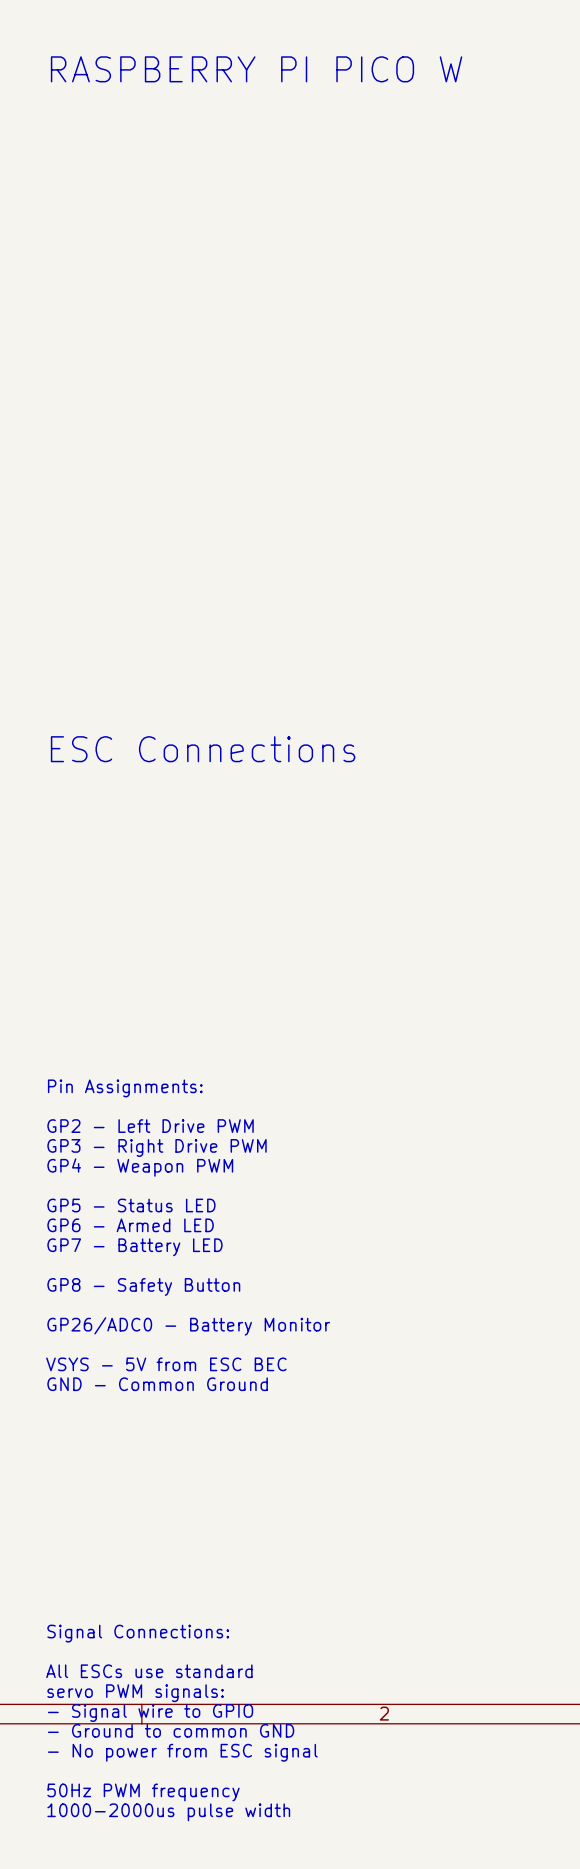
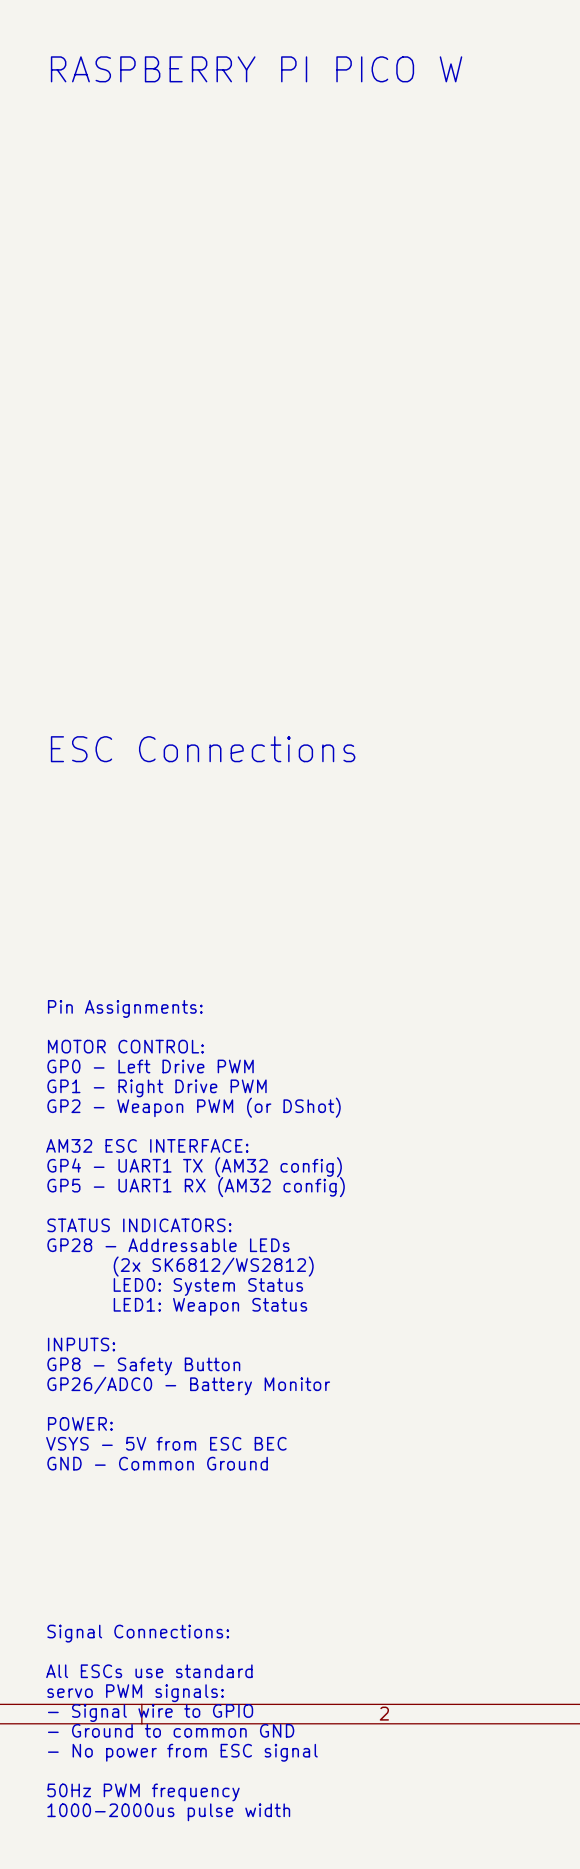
text: none -> Pin Assignments: (125, 1008)
text: none -> MOTOR CONTROL: (125, 1046)
text: none -> GP0 - Left Drive PWM (150, 1066)
text: Pin Assignments: (125, 1088) -> GP1 - Right Drive PWM (157, 1088)
text: none -> GP2 - Weapon PWM (or DShot) (194, 1107)
text: GP2 - Left Drive PWM (150, 1126) -> none
text: GP3 - Right Drive PWM (157, 1147) -> AM32 ESC INTERFACE: (147, 1145)
text: GP4 - Weapon PWM (140, 1167) -> GP4 - UART1 TX (AM32 config) (194, 1167)
text: none -> GP5 - UART1 RX (AM32 config) (196, 1187)
text: GP5 - Status LED (131, 1205) -> none
text: GP6 - Armed LED (130, 1225) -> STATUS INDICATORS: (139, 1225)
text: GP7 - Battery LED (134, 1247) -> GP28 - Addressable LEDs (168, 1245)
text: none -> (2x SK6812/WS2812) (213, 1266)
text: GP8 - Safety Button (143, 1286) -> LED0: System Status (208, 1286)
text: none -> LED1: Weapon Status (210, 1306)
text: GP26/ADC0 - Battery Monitor (188, 1326) -> none
text: none -> INPUTS: (81, 1344)
text: VSYS - 5V from ESC BEC (166, 1364) -> GP8 - Safety Button (143, 1366)
text: GND - Common Ground (157, 1384) -> GP26/ADC0 - Battery Monitor (188, 1385)
text: none -> POWER: (80, 1423)
text: none -> VSYS - 5V from ESC BEC (166, 1443)
text: none -> GND - Common Ground (157, 1463)

